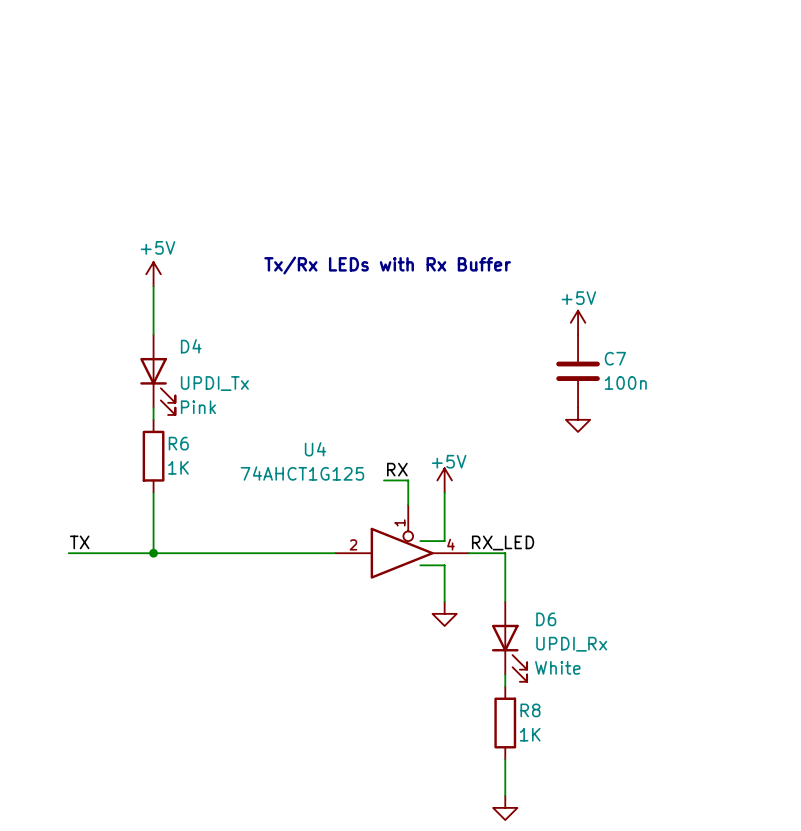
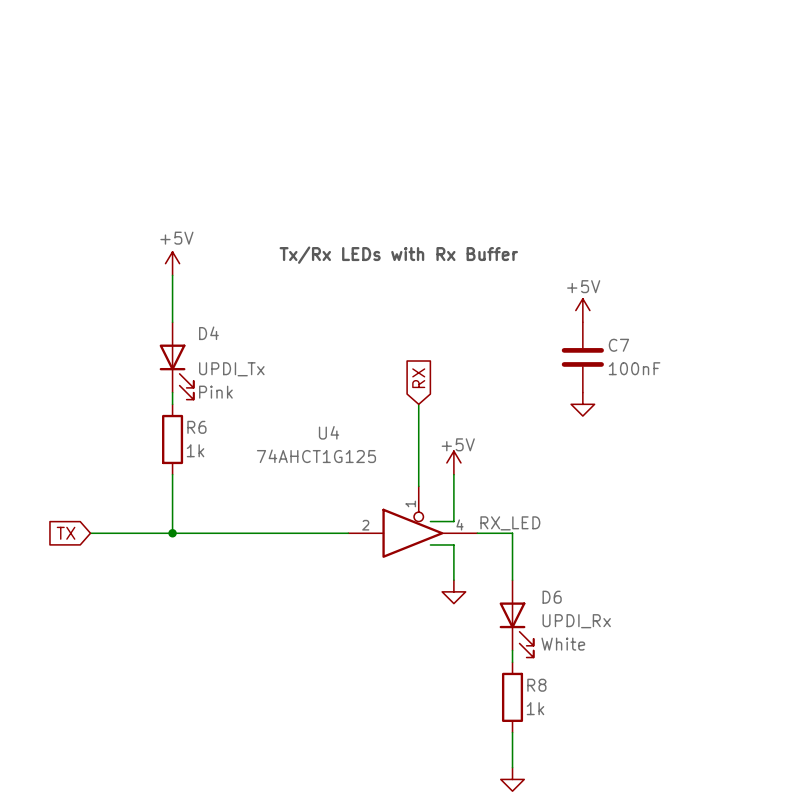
C7 value: 100n (625, 382) -> 100nF (634, 368)
global label: none -> RX (418, 378)
R6 value: 1K (178, 467) -> 1k (195, 450)
label: RX (397, 469) -> none
wire: (383, 480) (408, 480) -> (418, 404) (418, 462)
label: TX (79, 542) -> none
global label: none -> TX (66, 533)
R8 value: 1K (530, 734) -> 1k (535, 708)

